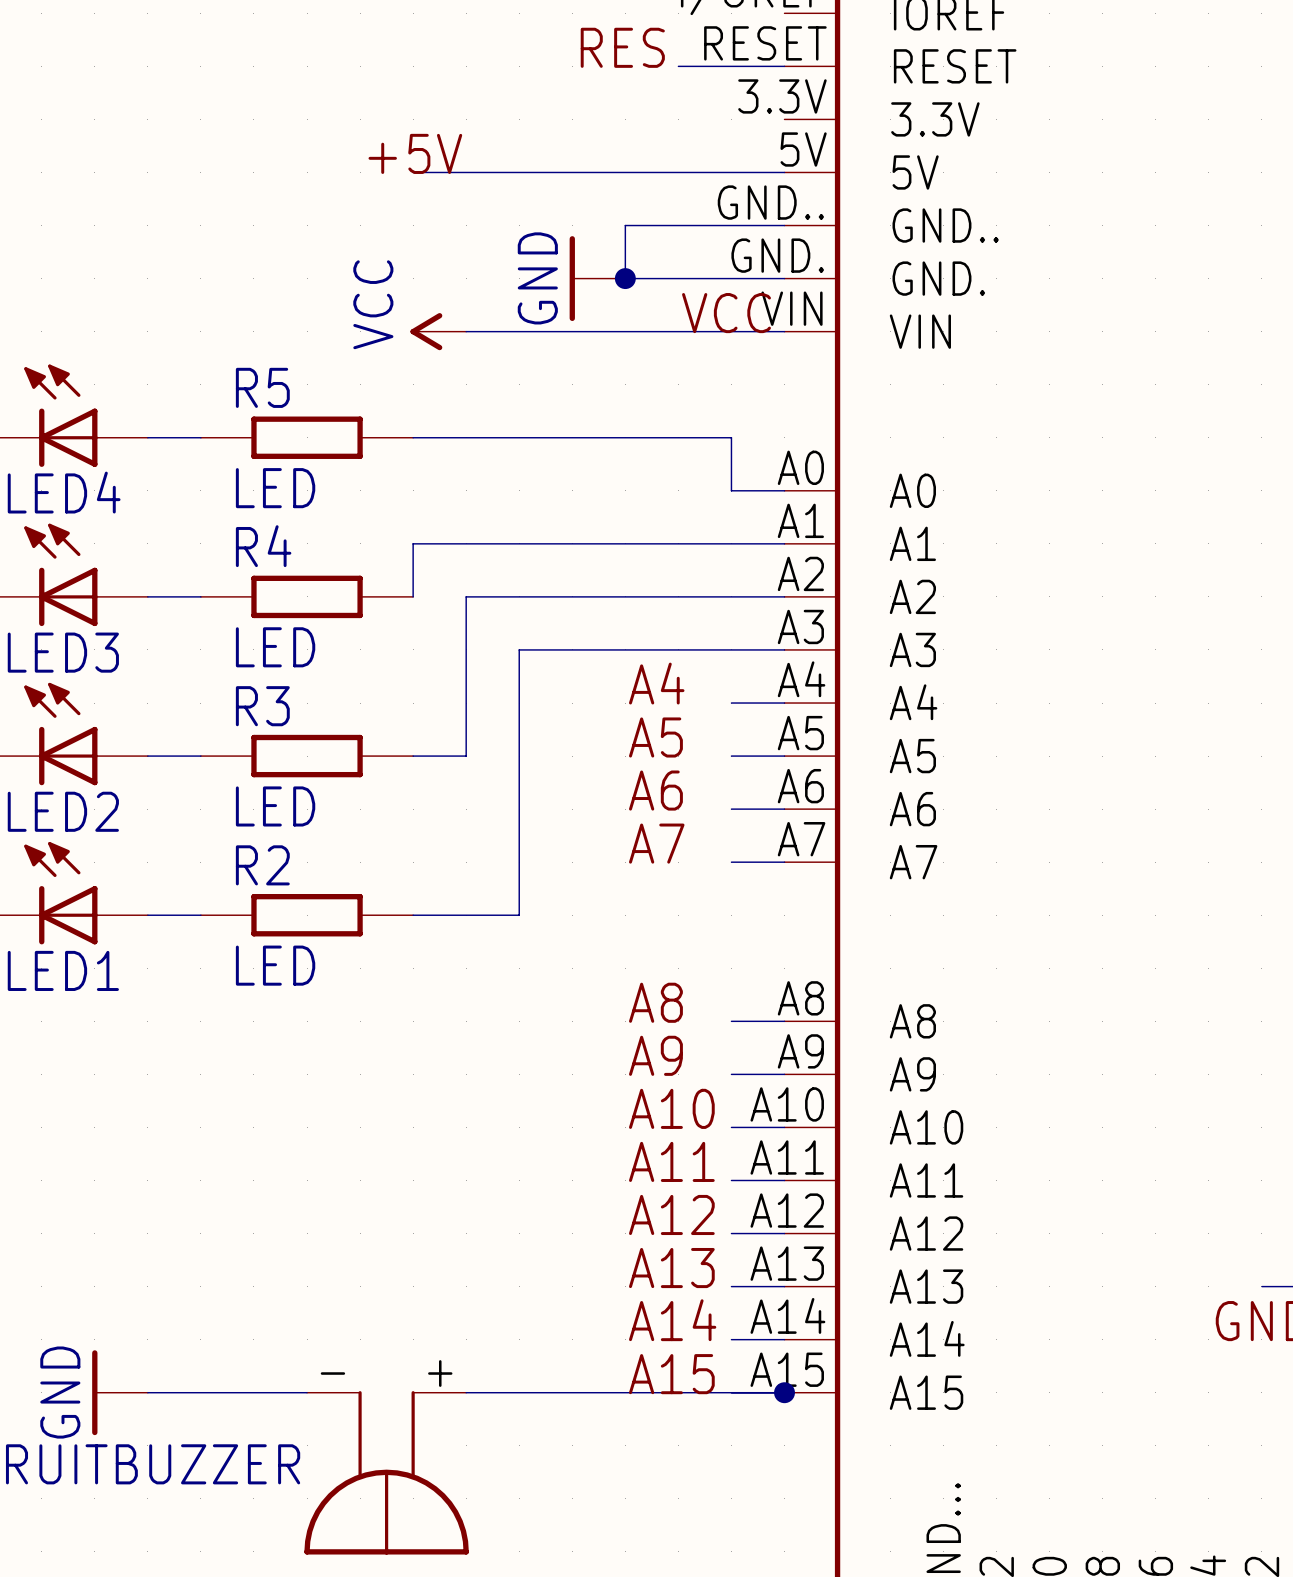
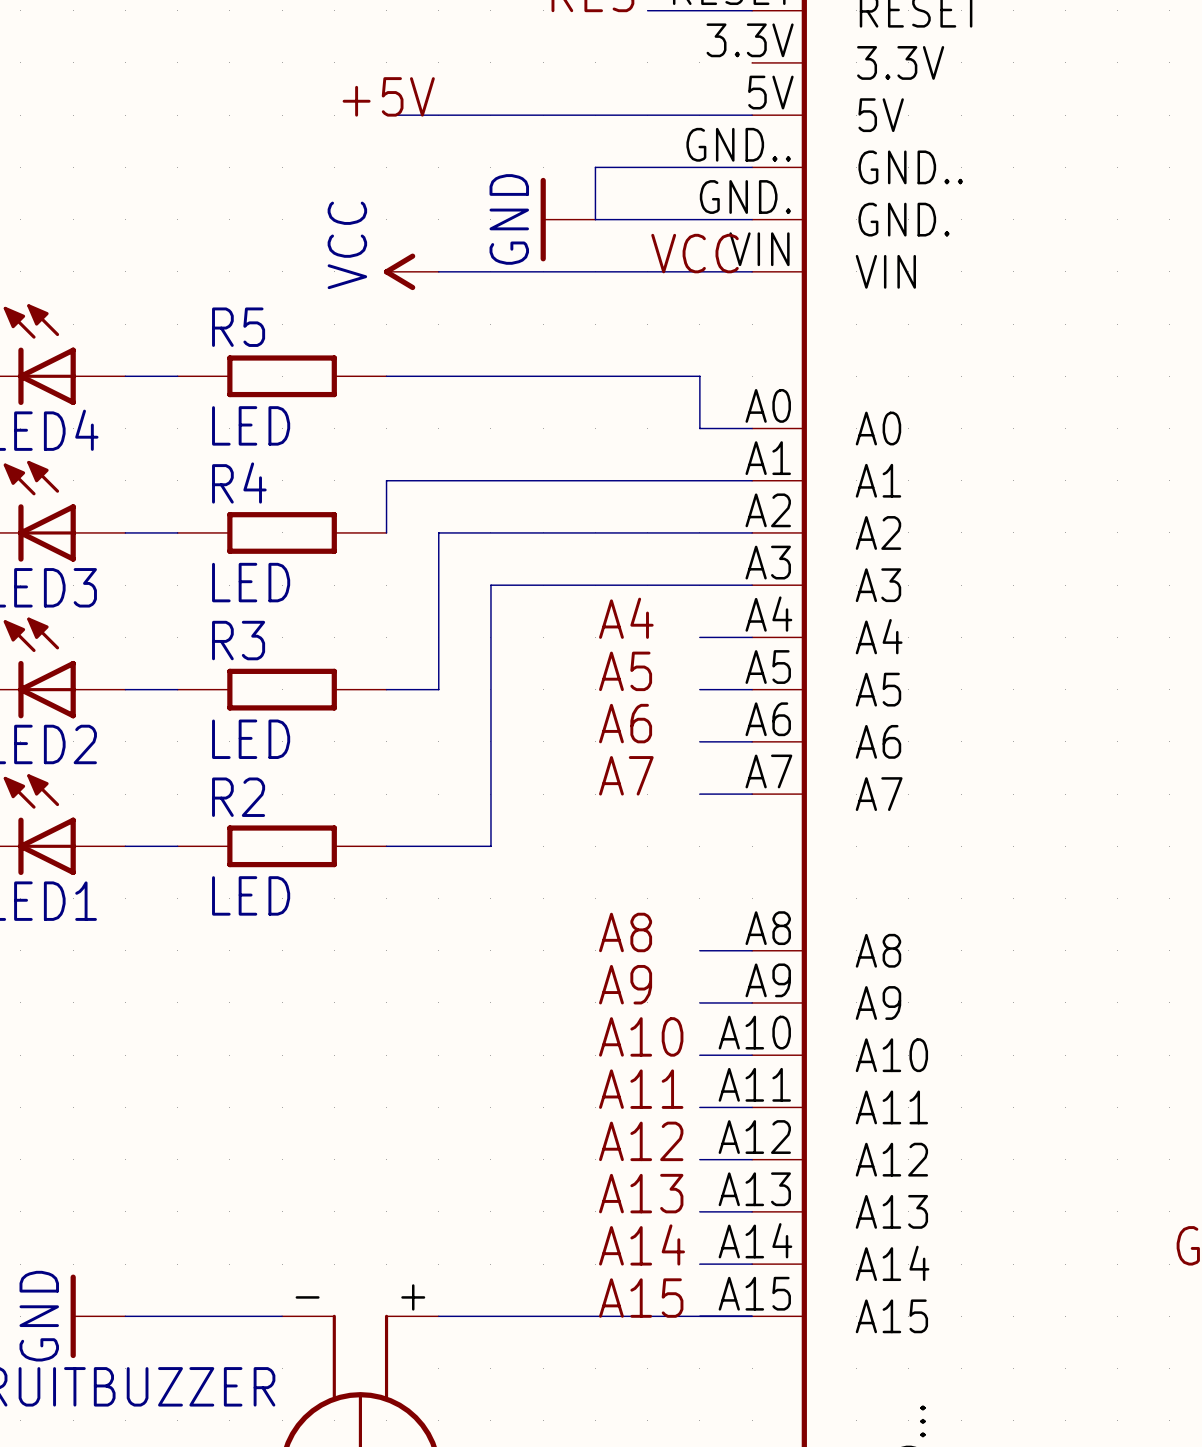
junction: (625, 278) -> none
junction: (784, 1392) -> none

